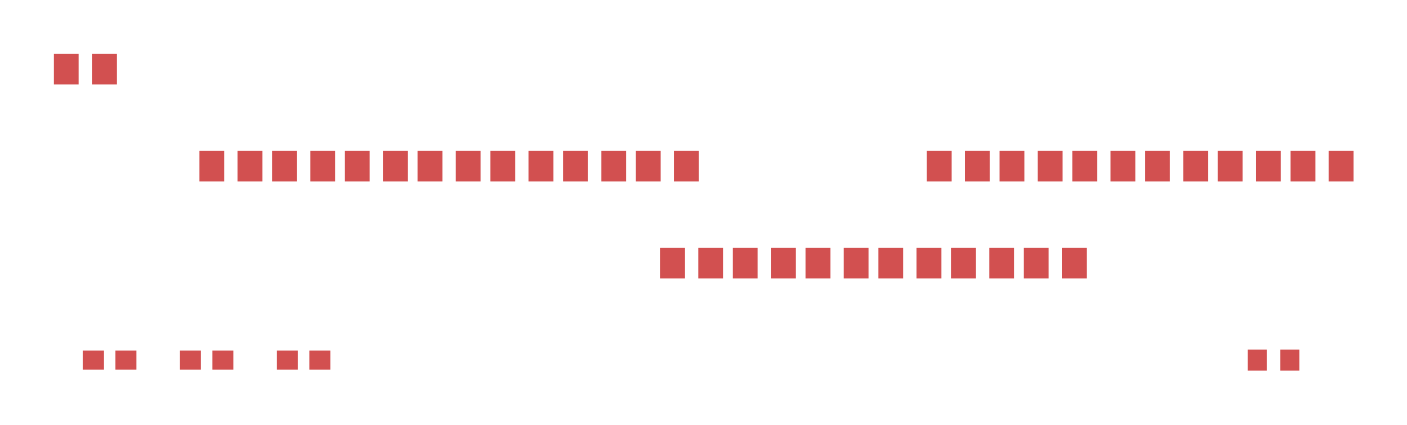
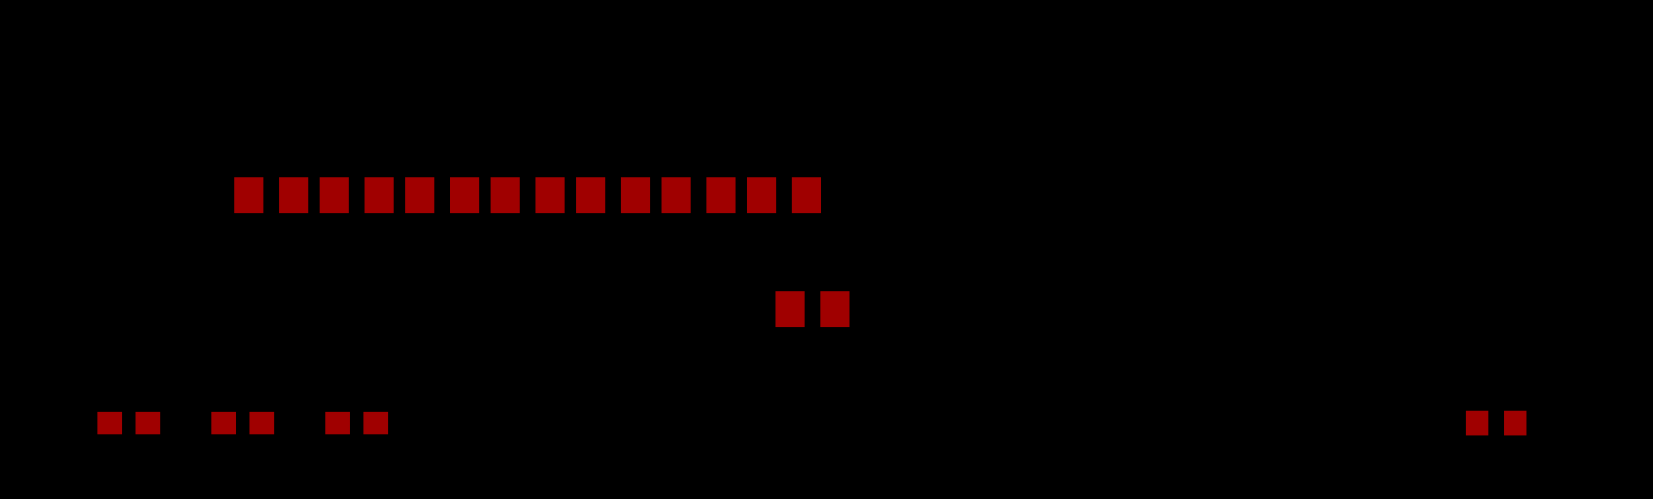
part: (85, 69) -> none
part: (958, 166) -> none
part: (1031, 166) -> none
part: (1103, 166) -> none
part: (1176, 166) -> none
part: (1249, 166) -> none
part: (1322, 166) -> none
part: (764, 263) -> none
part: (837, 263) -> none
part: (909, 263) -> none
part: (982, 263) -> none
part: (1055, 263) -> none

